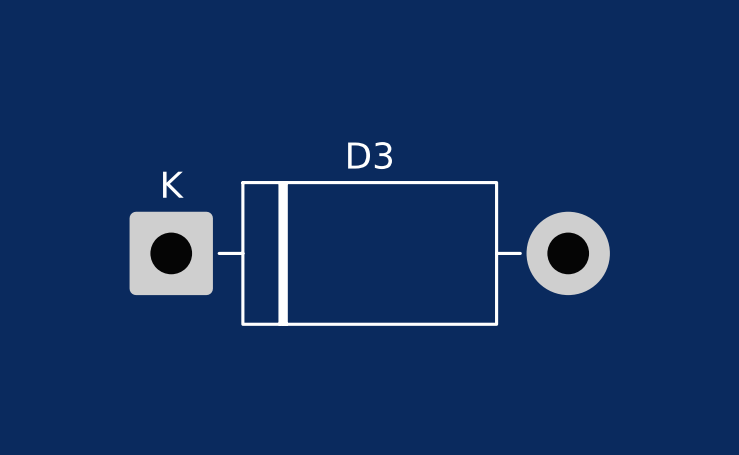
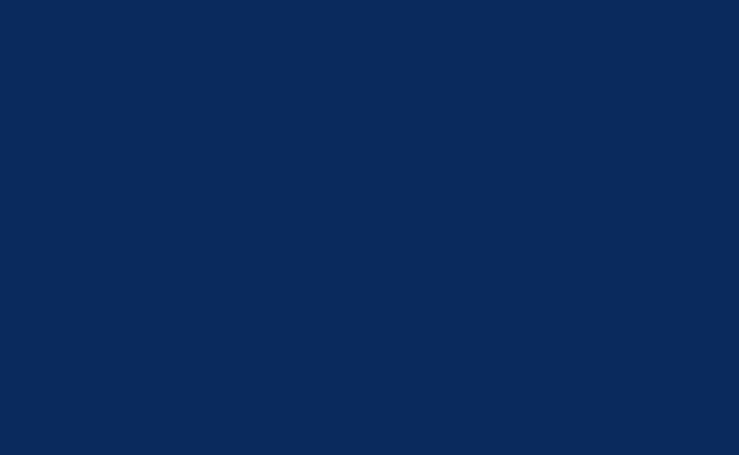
D3: (369, 253) -> none

